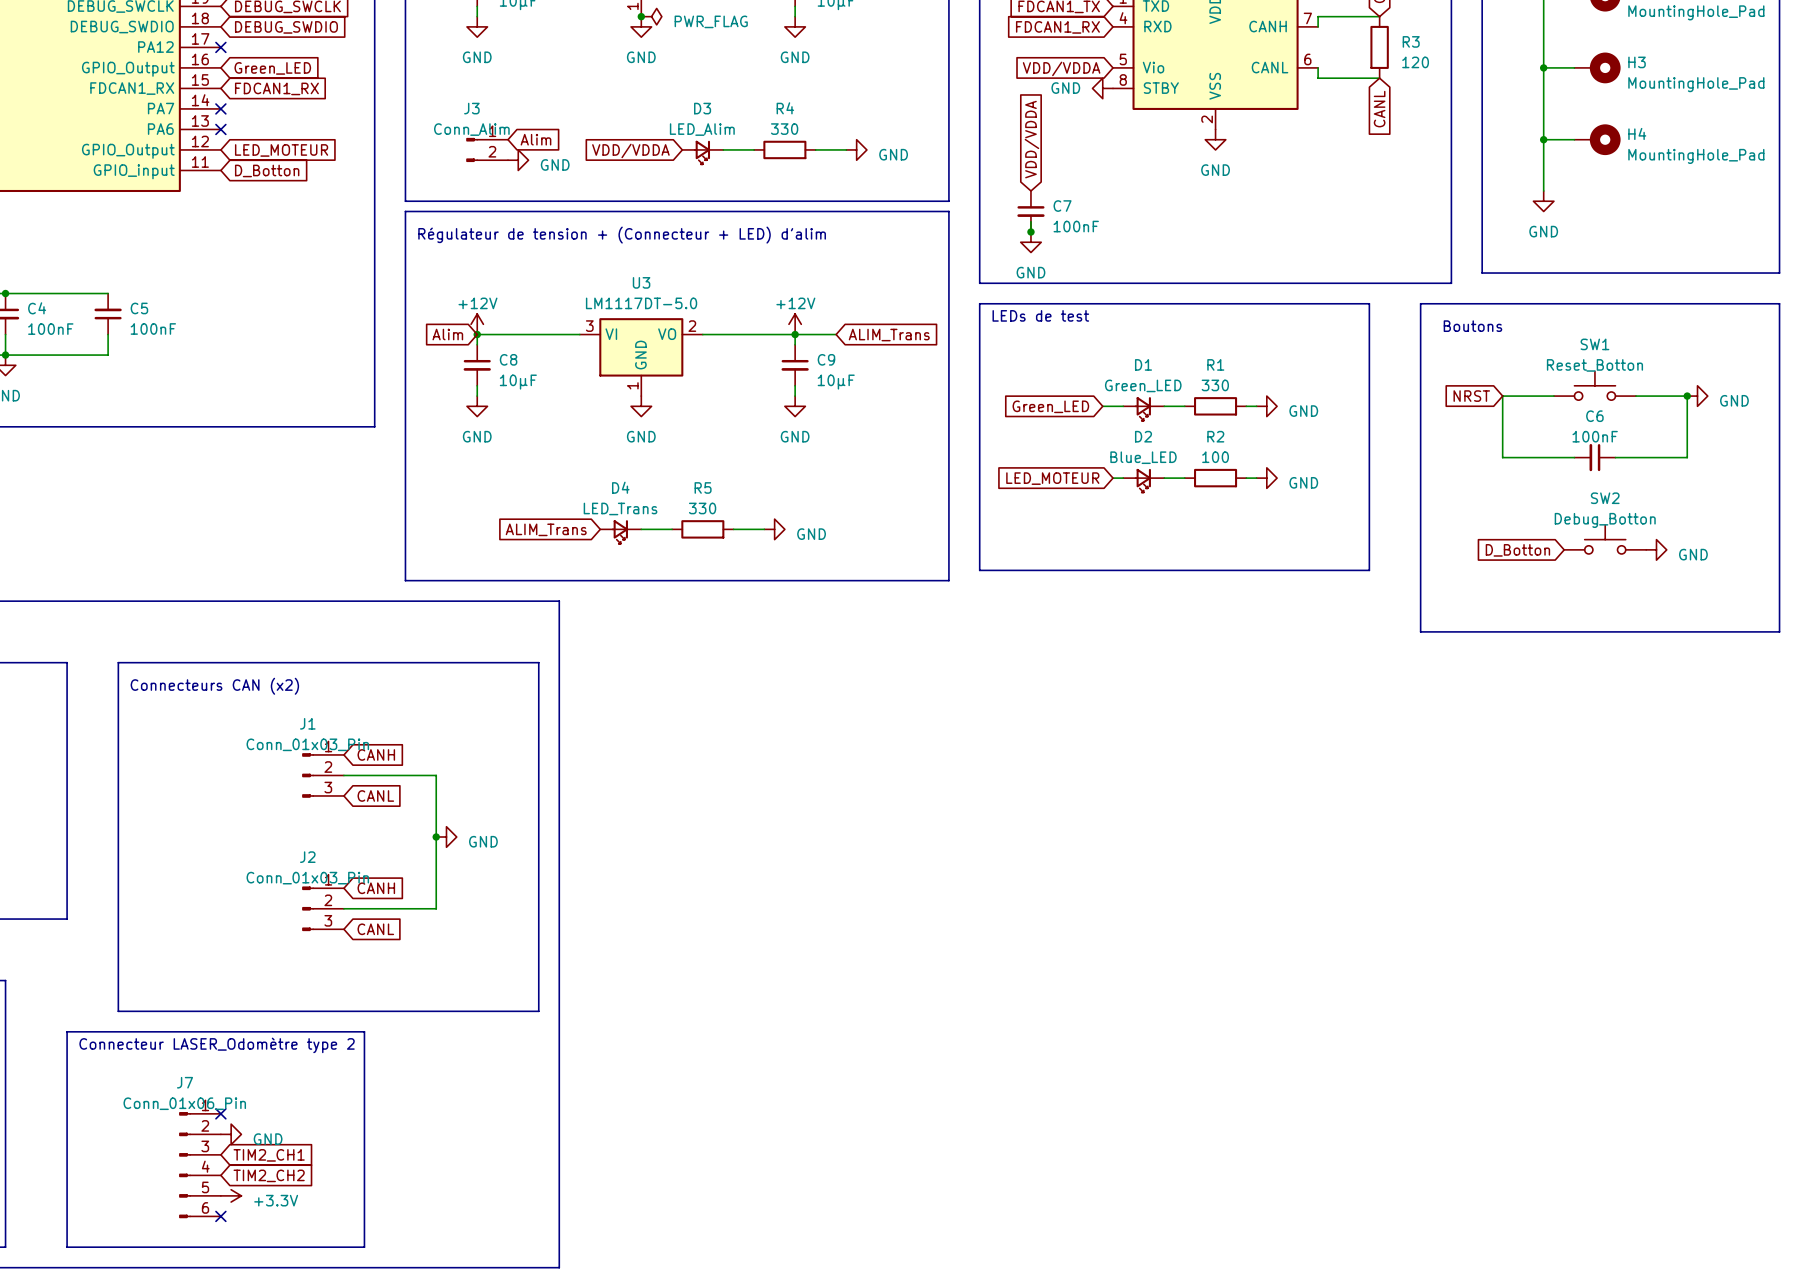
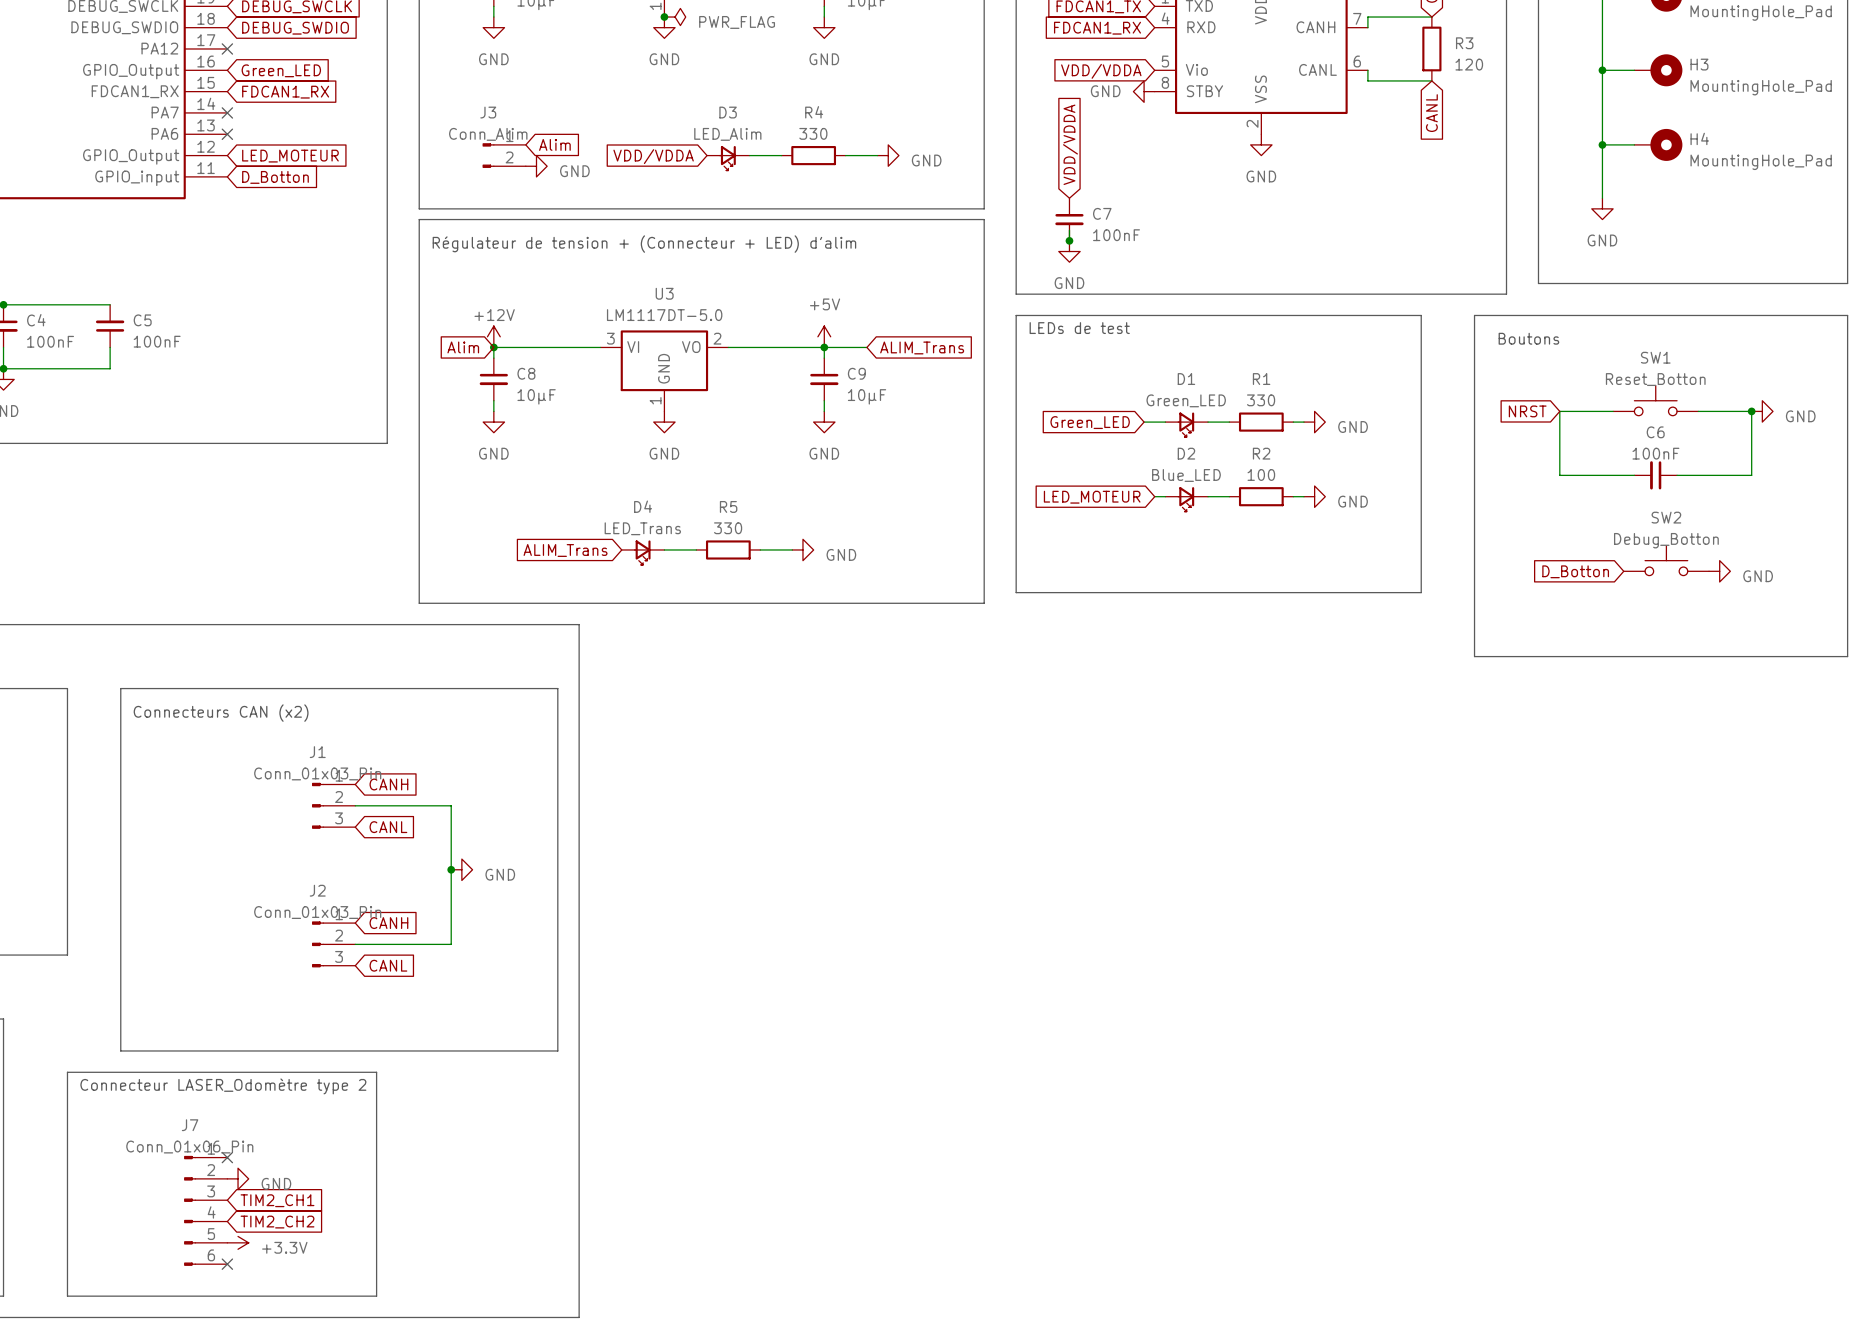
power symbol: +12V (795, 324) -> +5V (824, 336)

